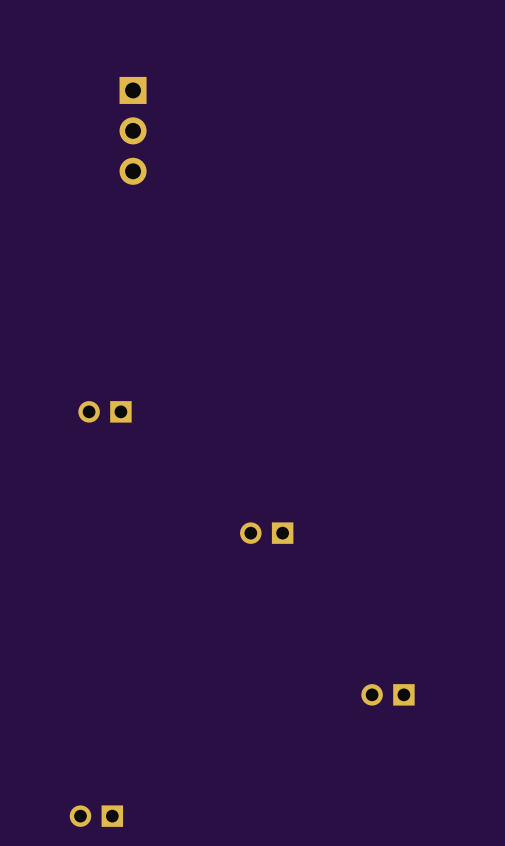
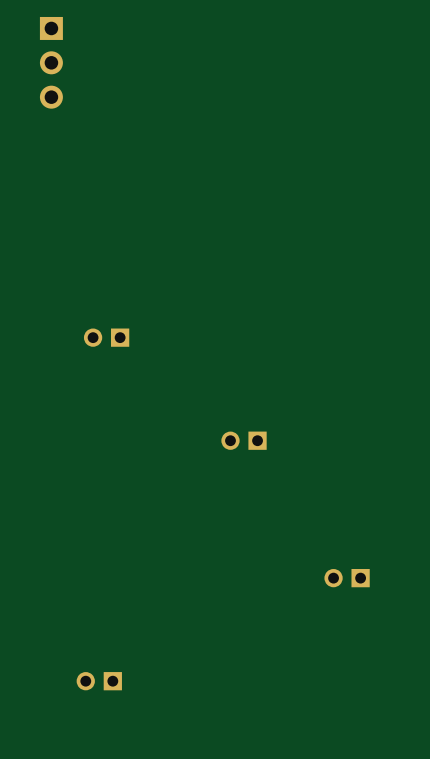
part position: (133, 130) -> (51, 62)

